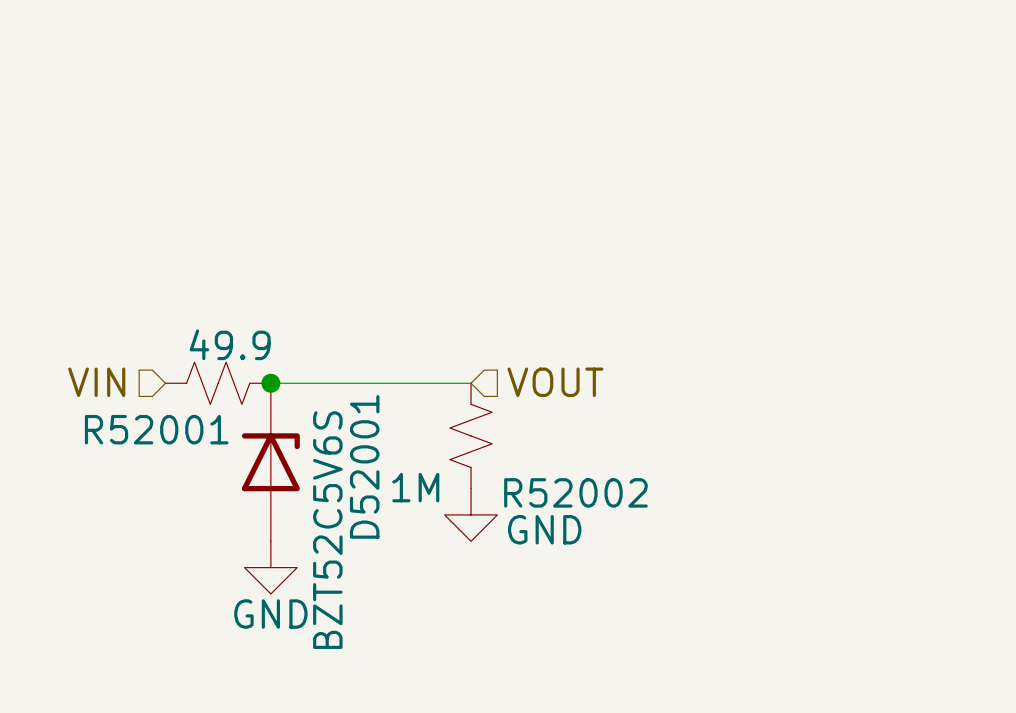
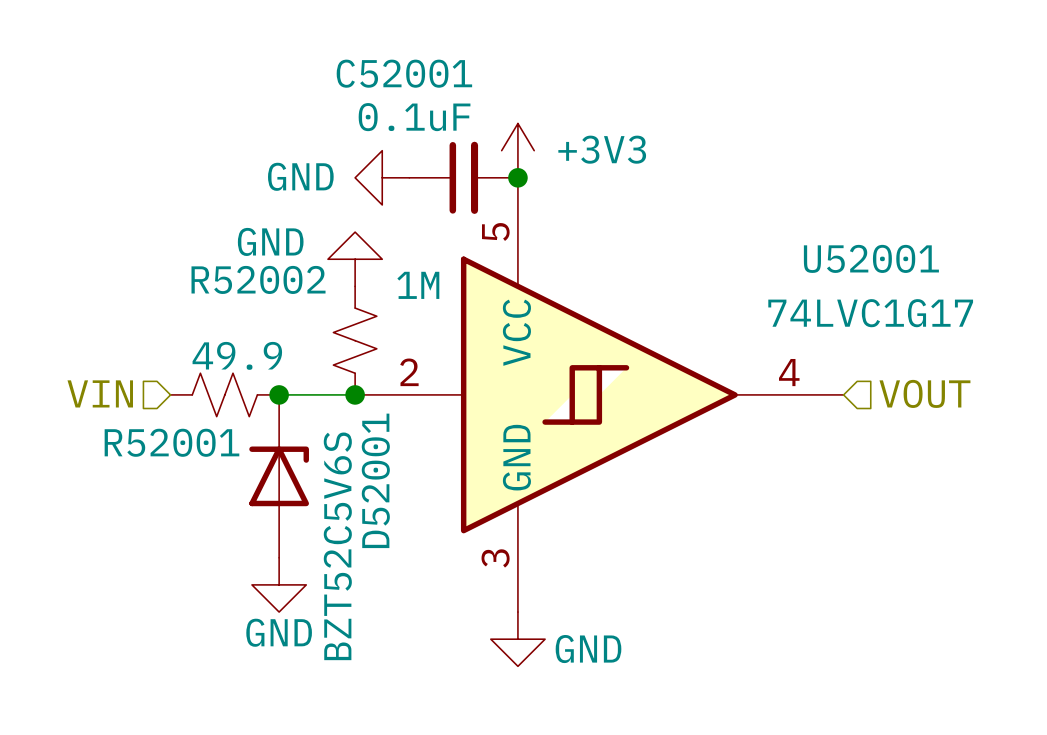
power symbol: none -> +3V3 (517, 150)
power symbol: none -> GND (382, 177)
C52001: none -> 0.1uF (463, 177)
junction: none -> (517, 177)
power symbol: none -> GND (355, 259)
hierarchical label position: VOUT (555, 382) -> VOUT (924, 393)
junction: none -> (355, 394)
U52001: none -> 74LVC1G17 (599, 394)
R52002 position: (471, 435) -> (355, 340)
R52002 value position: 1M (415, 487) -> 1M (418, 285)
R52002 name position: R52002 (575, 492) -> R52002 (258, 279)
power symbol position: GND (471, 514) -> GND (517, 639)
power symbol text position: GND (544, 529) -> GND (588, 649)

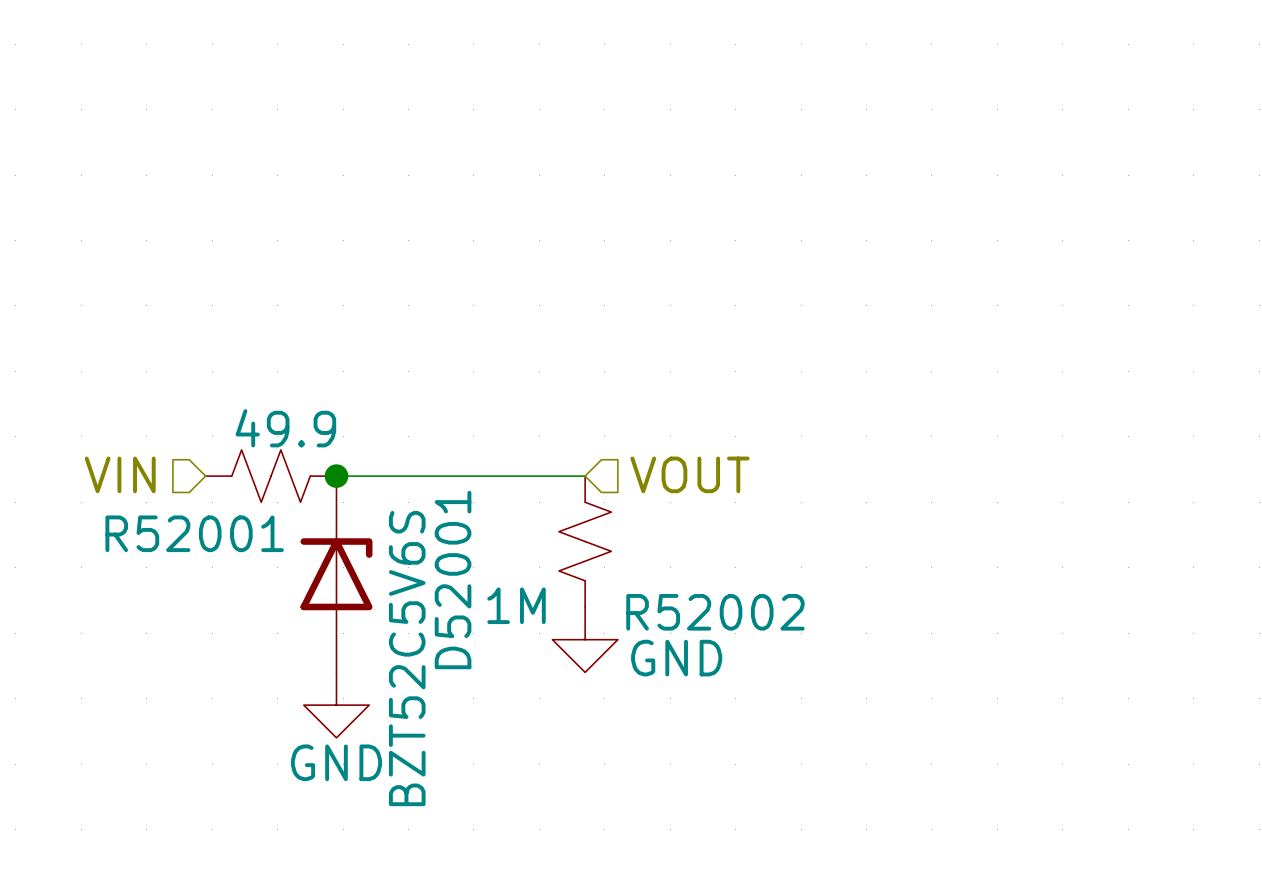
power symbol: +3V3 (517, 150) -> none
power symbol: GND (382, 177) -> none
C52001: 0.1uF (463, 177) -> none
junction: (517, 177) -> none
power symbol: GND (355, 259) -> none
R52002 name position: R52002 (258, 279) -> R52002 (715, 612)
R52002 value position: 1M (418, 285) -> 1M (516, 605)
R52002 position: (355, 340) -> (585, 541)
hierarchical label position: VOUT (924, 393) -> VOUT (690, 474)
junction: (355, 394) -> none
U52001: 74LVC1G17 (599, 394) -> none
power symbol position: GND (517, 639) -> GND (585, 639)
power symbol text position: GND (588, 649) -> GND (676, 658)

